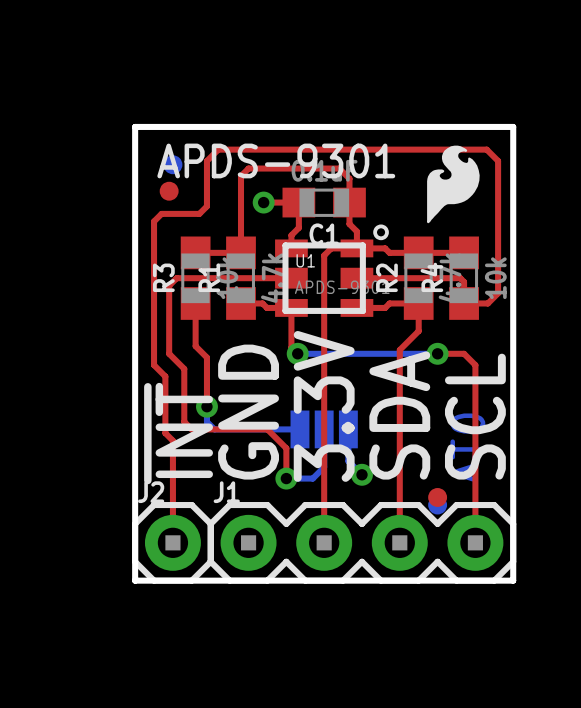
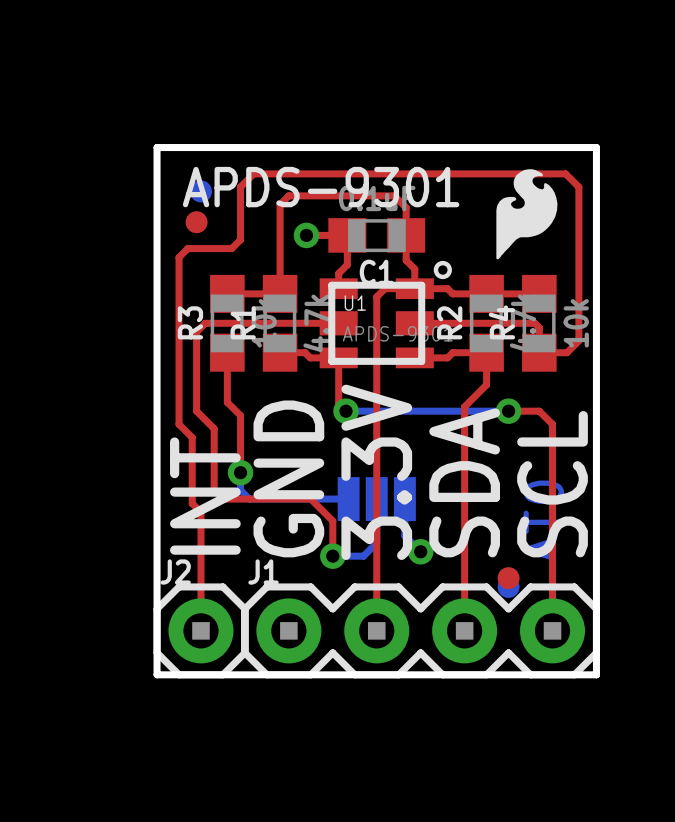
text: ~{INT} (178, 433) -> INT (205, 496)

